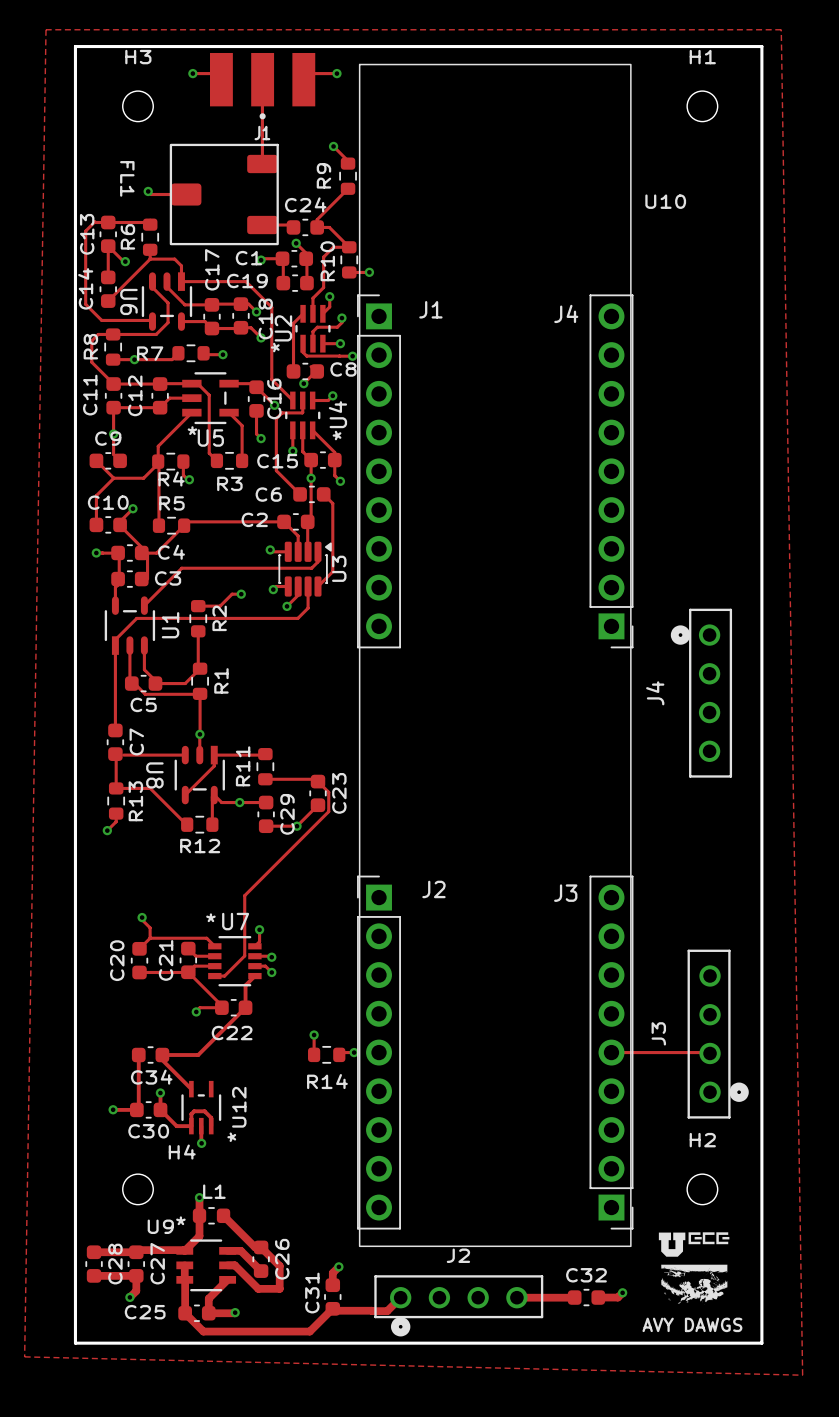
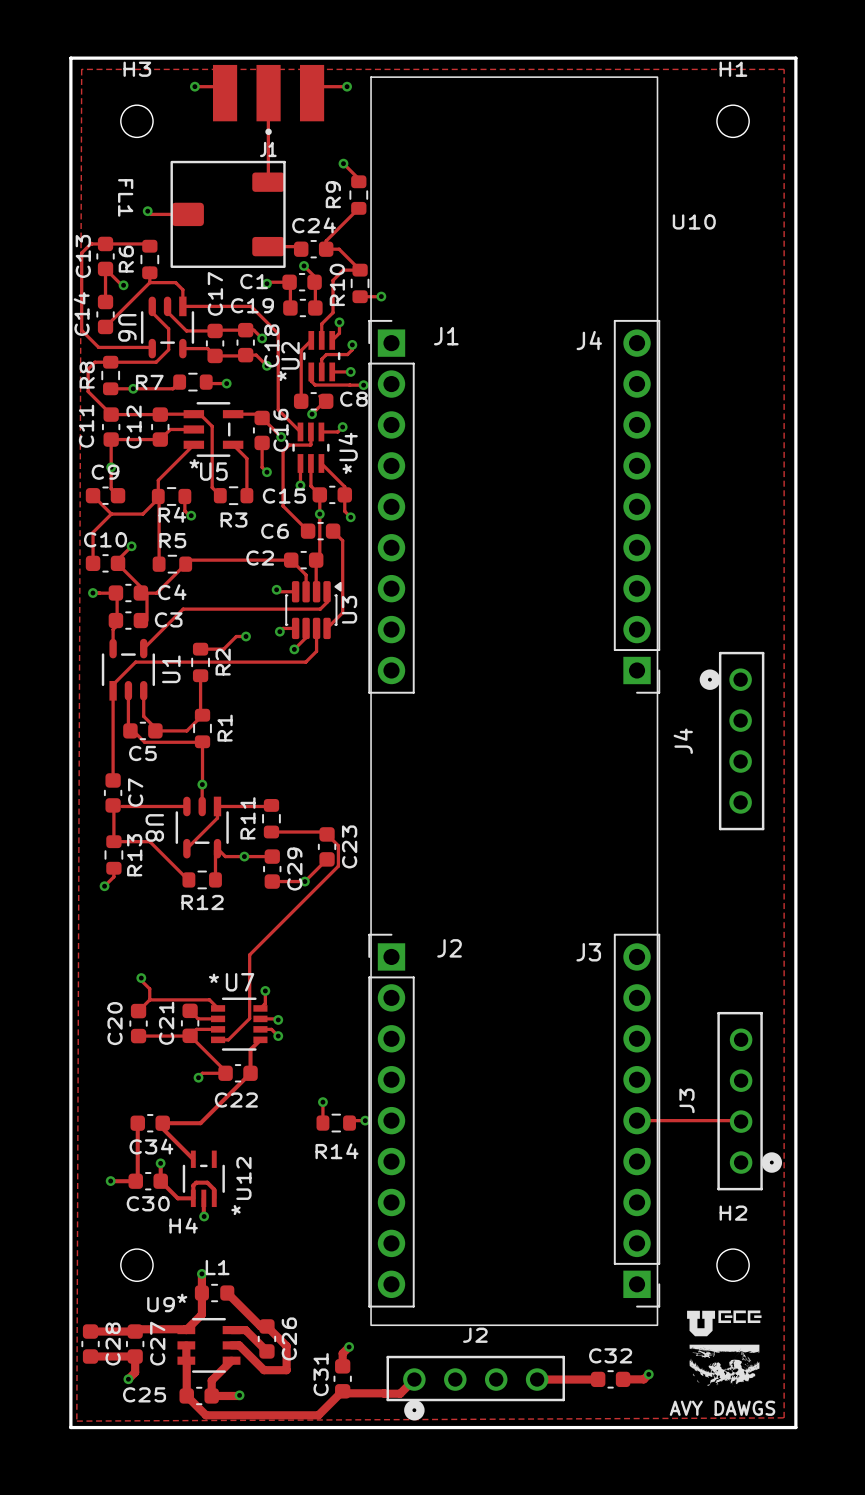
zone outline: (46, 29) (24, 1356) (802, 1375) (781, 29) (46, 29) -> (81, 69) (76, 1421) (784, 1417) (784, 69) (81, 69)

